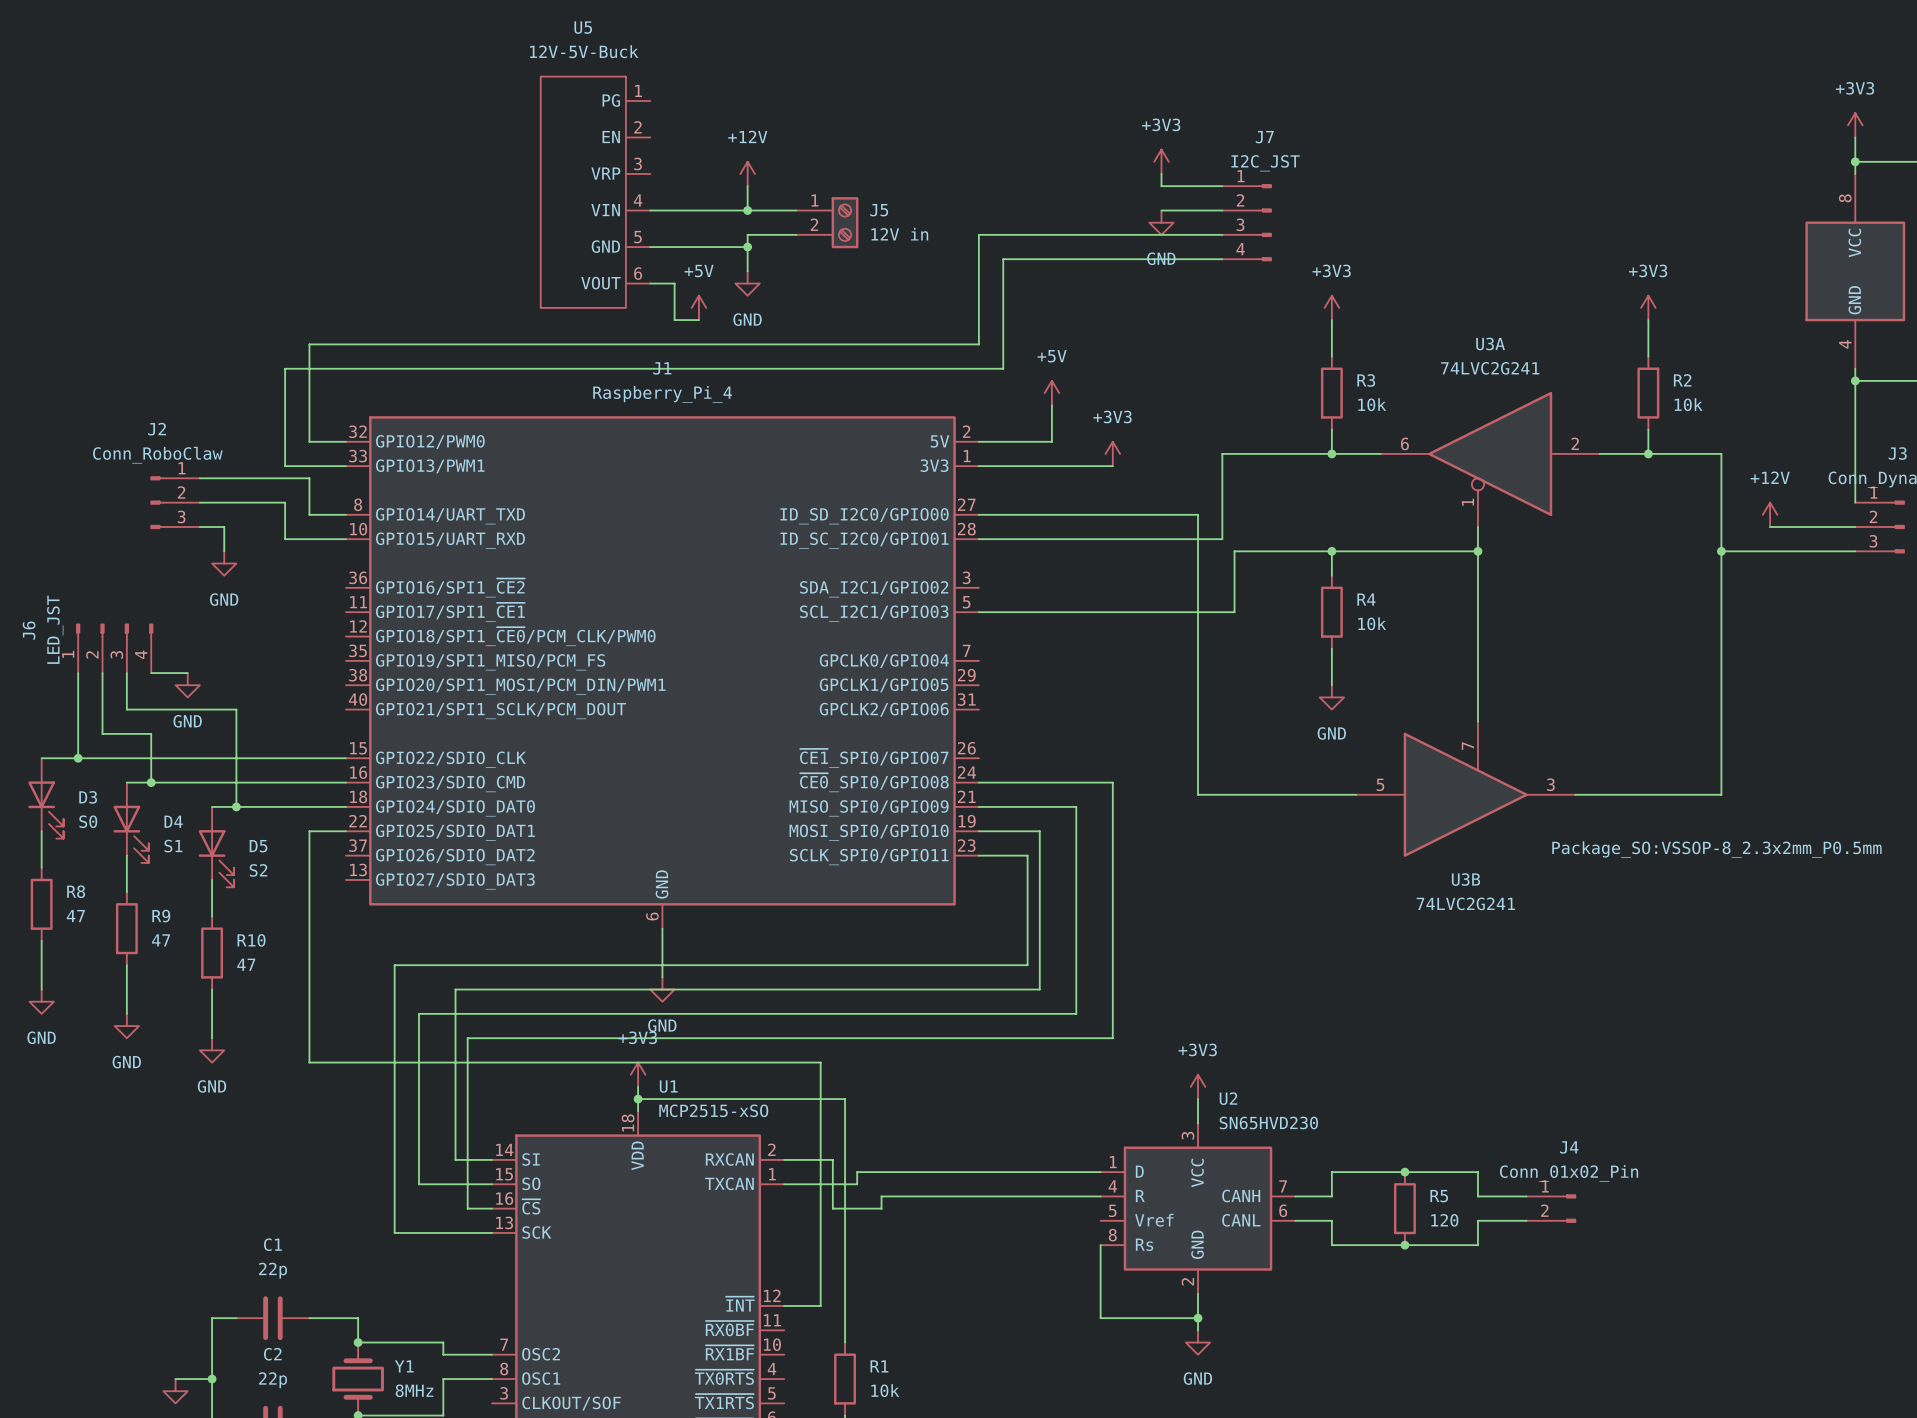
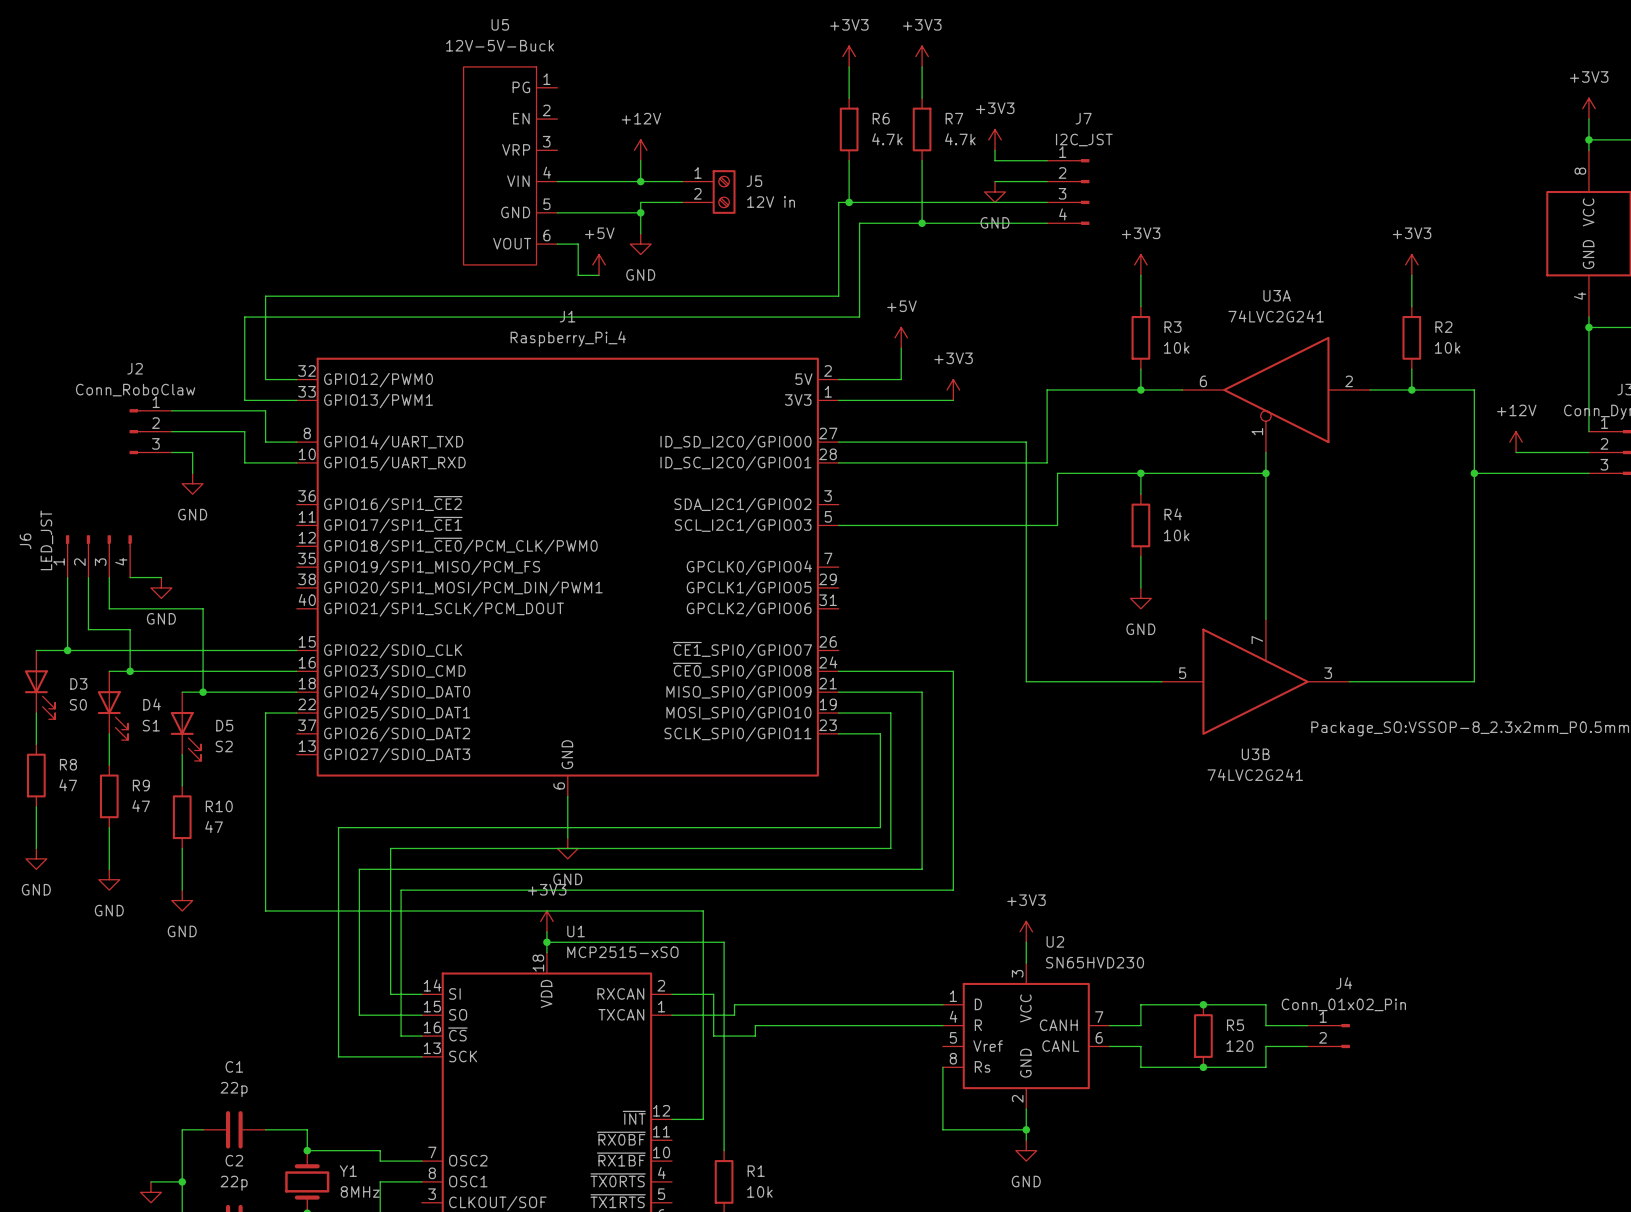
power symbol: none -> +3V3 (849, 56)
power symbol: none -> +3V3 (922, 56)
wire: none -> (849, 66) (849, 98)
wire: none -> (922, 66) (922, 98)
R6: none -> 4.7k (849, 129)
R7: none -> 4.7k (922, 129)
wire: none -> (849, 160) (849, 202)
wire: none -> (922, 160) (922, 223)
junction: none -> (849, 202)
junction: none -> (922, 223)

